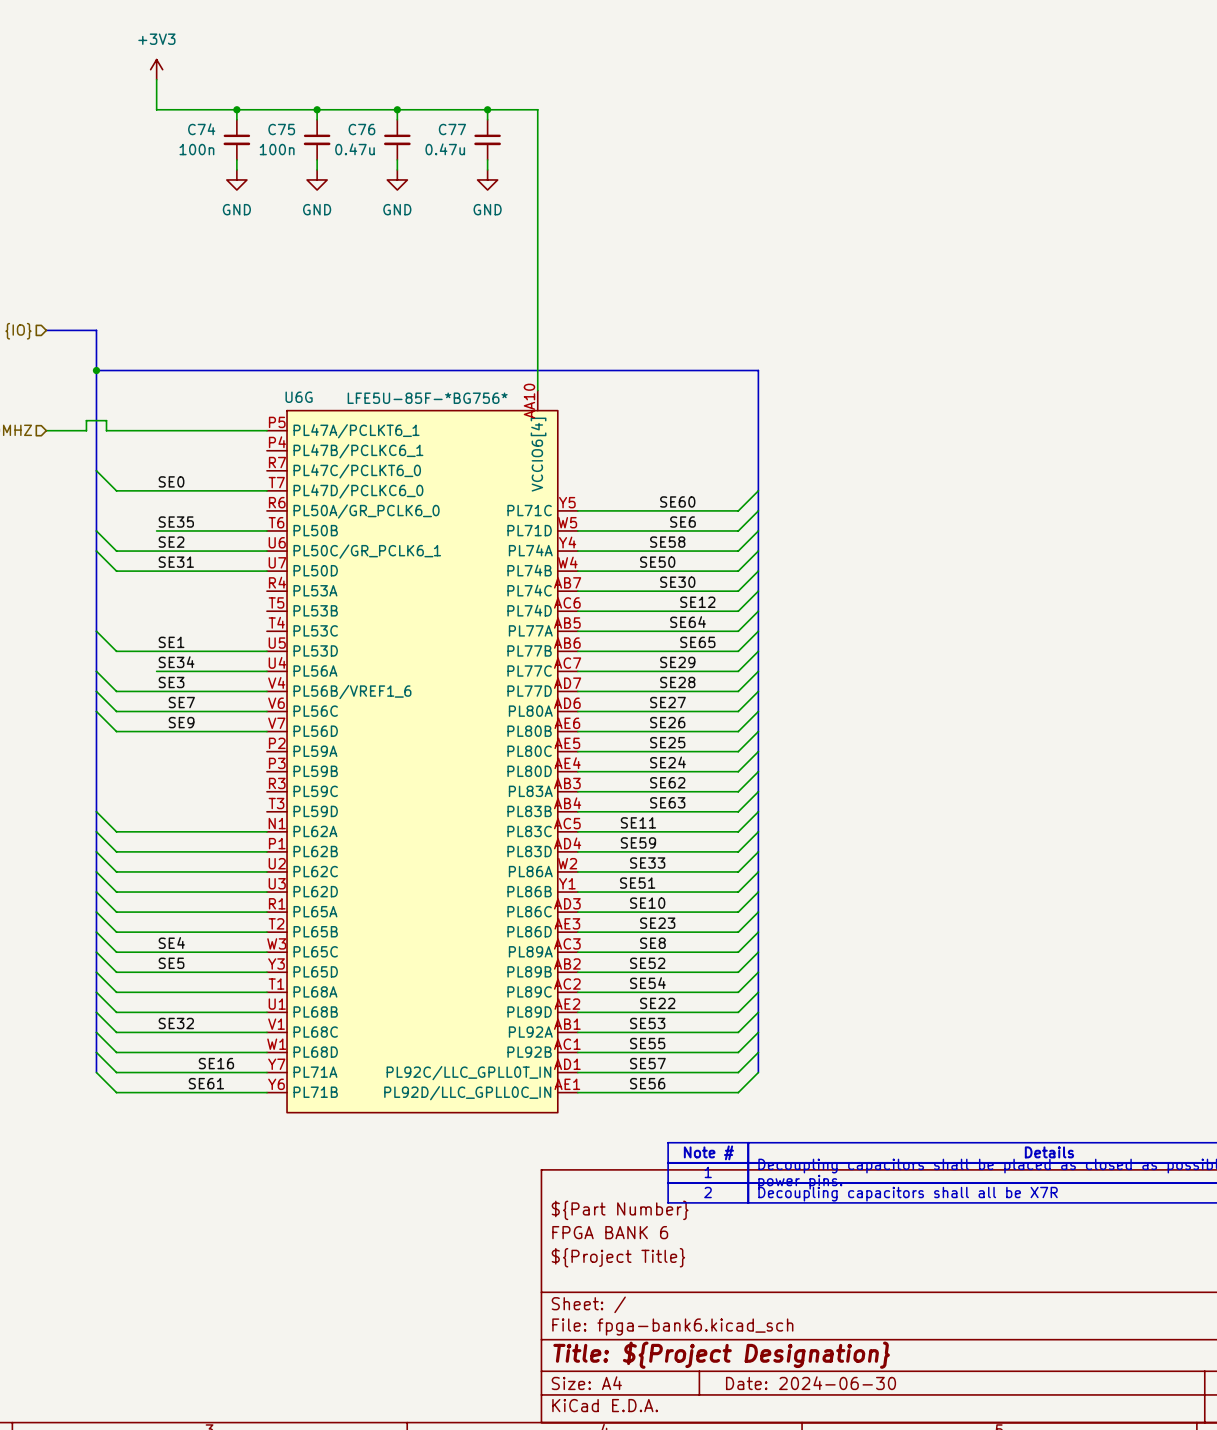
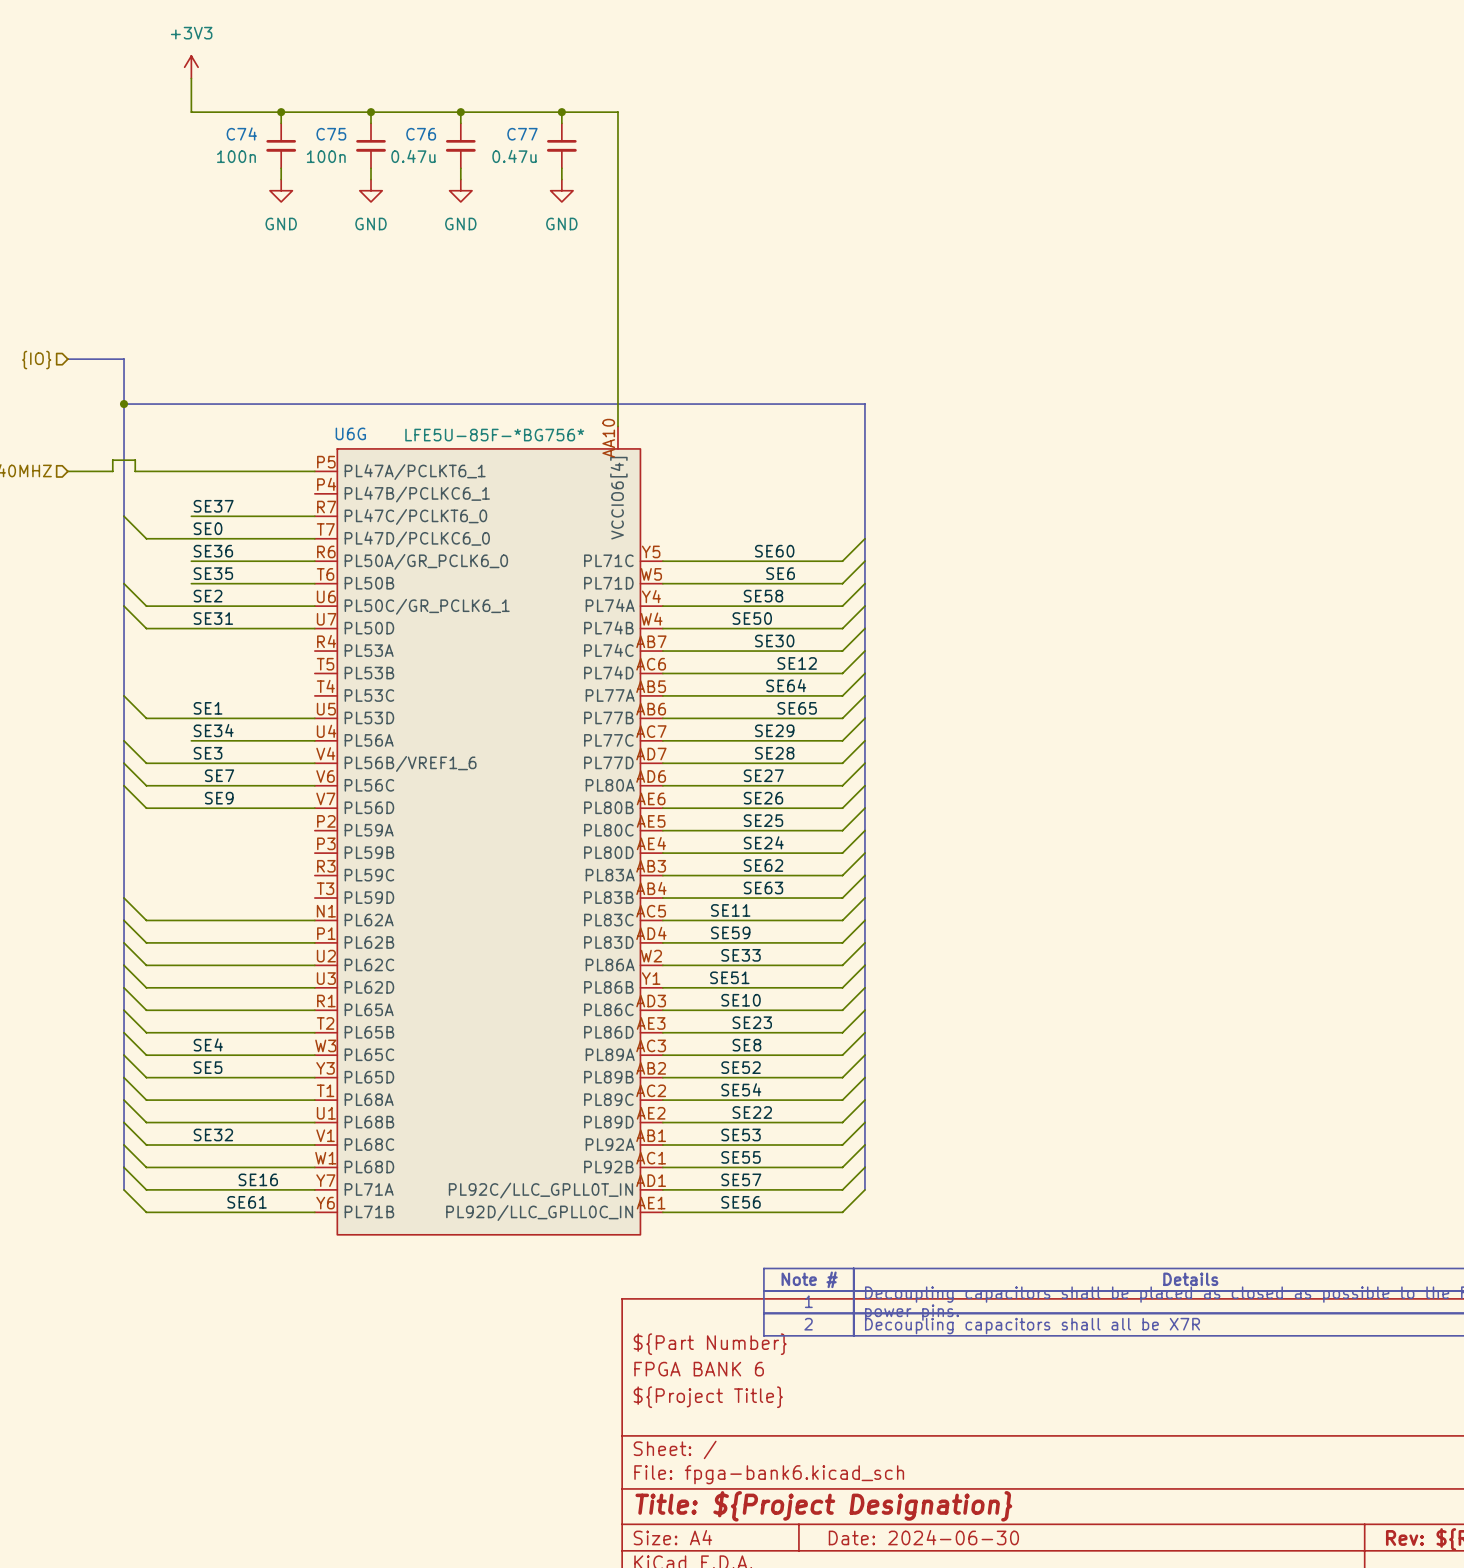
label: none -> SE37 (213, 506)
wire: none -> (191, 516) (314, 516)
label: none -> SE36 (213, 551)
wire: none -> (191, 561) (314, 561)

